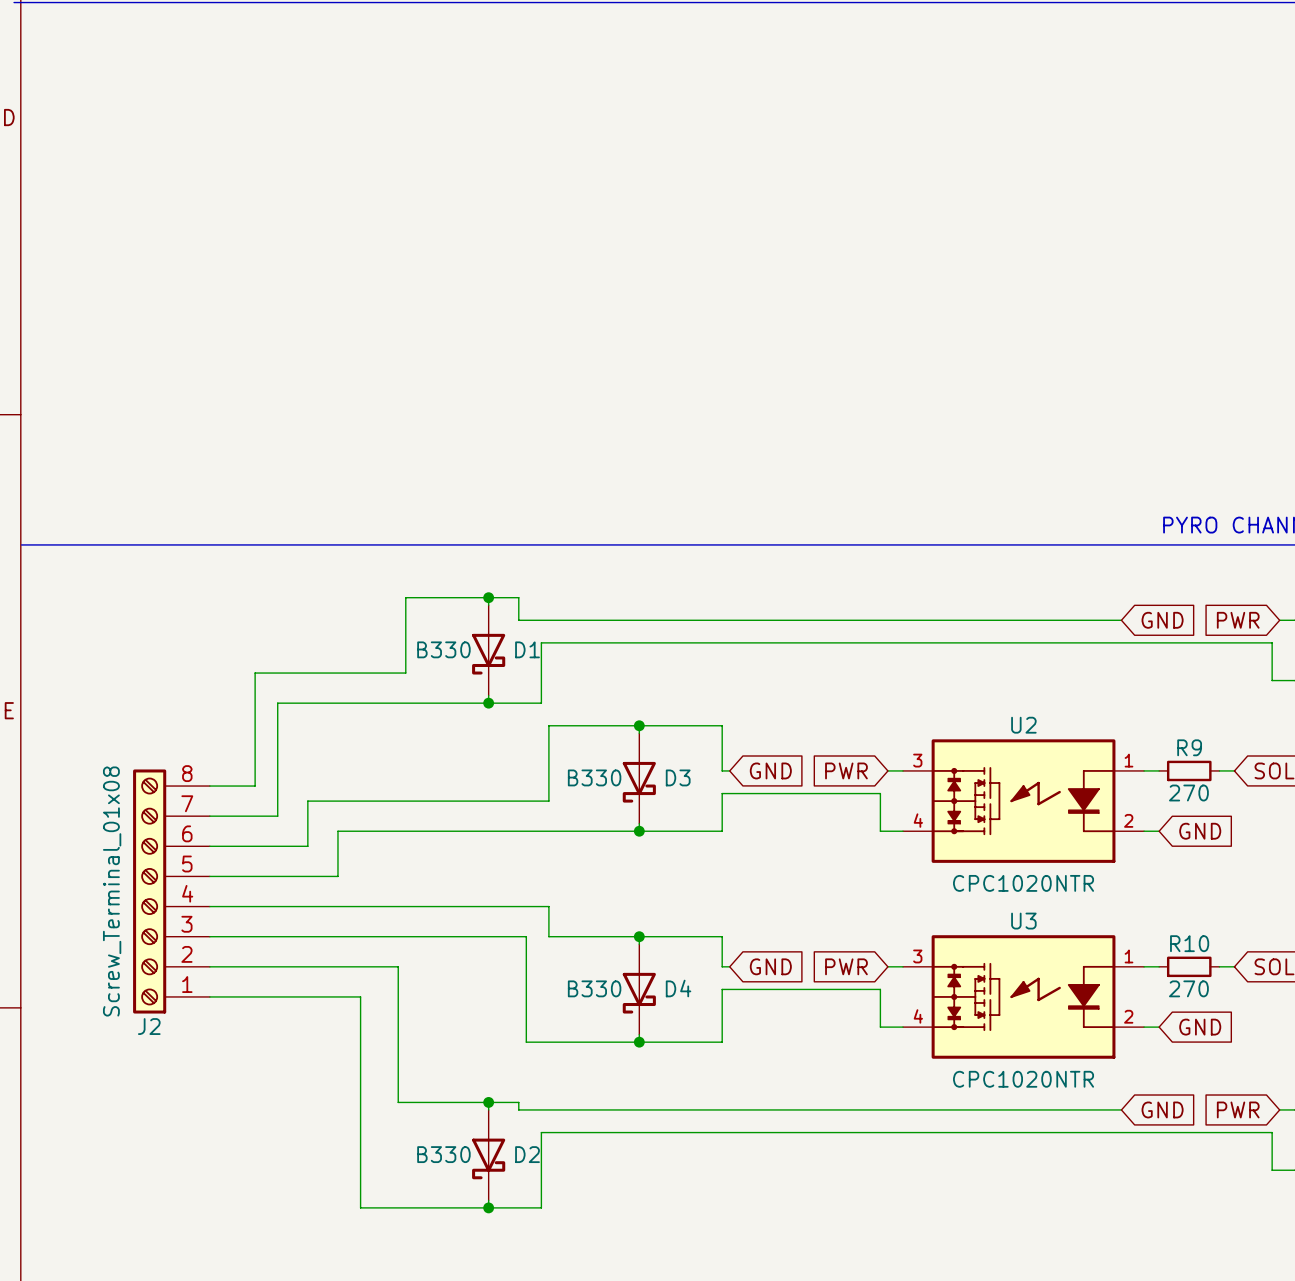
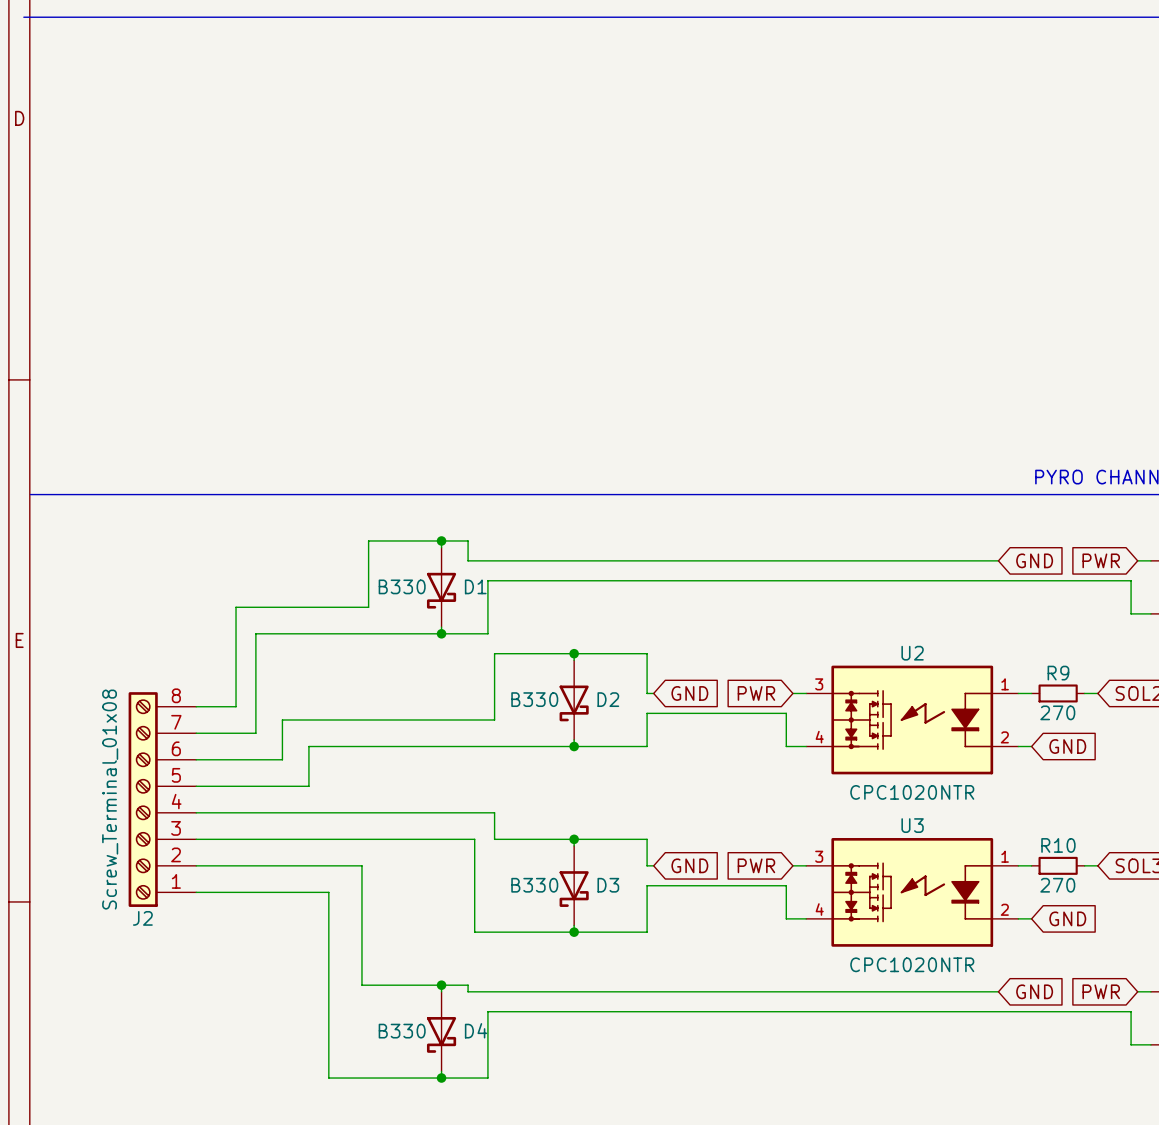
D3 name: D3 (678, 777) -> D2 (608, 699)
D4 name: D4 (678, 988) -> D3 (608, 885)
D2 name: D2 (527, 1154) -> D4 (476, 1030)

